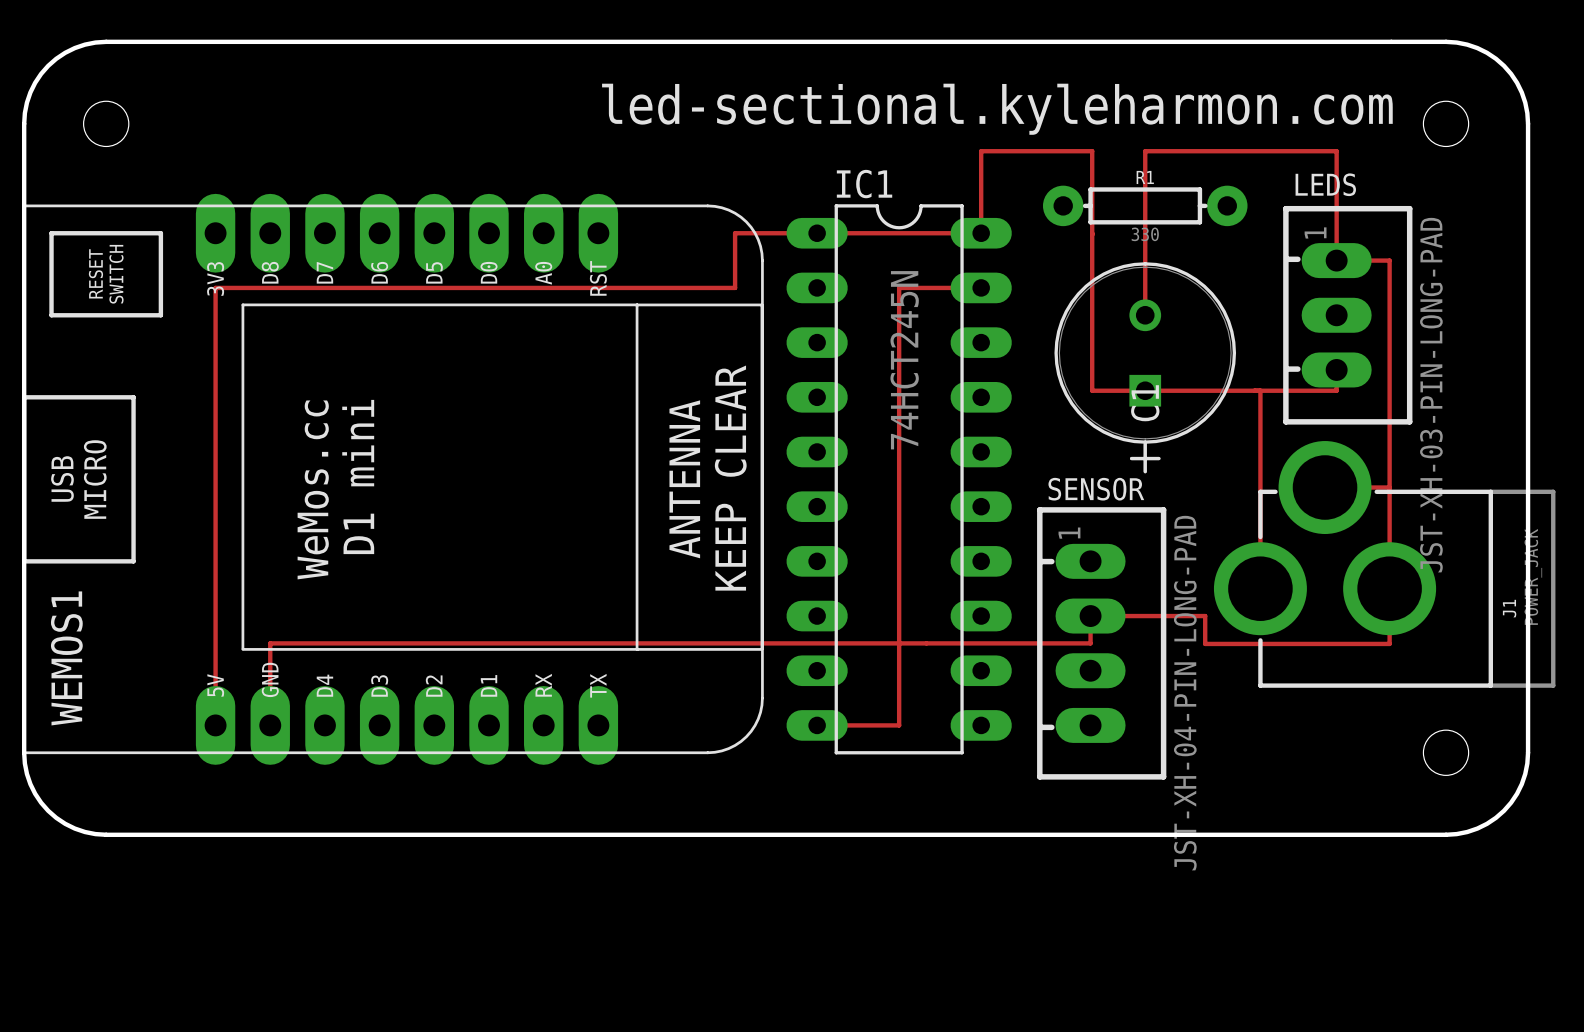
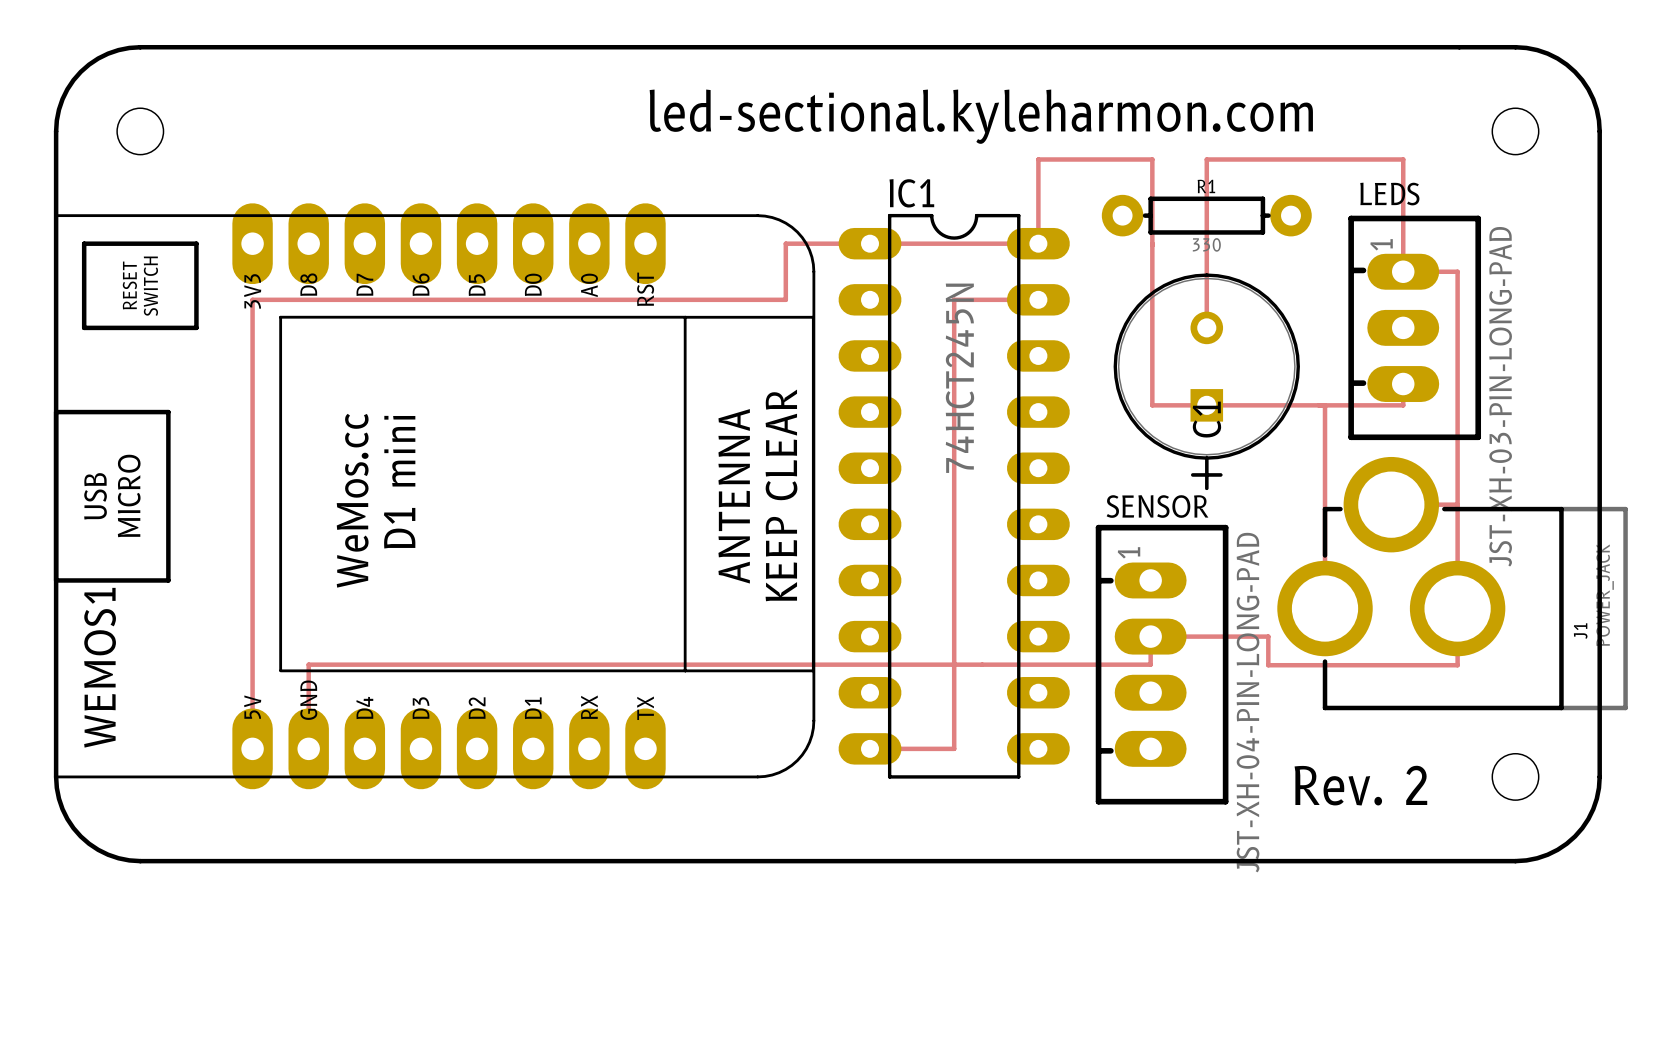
text: none -> Rev. 2 (1360, 785)

